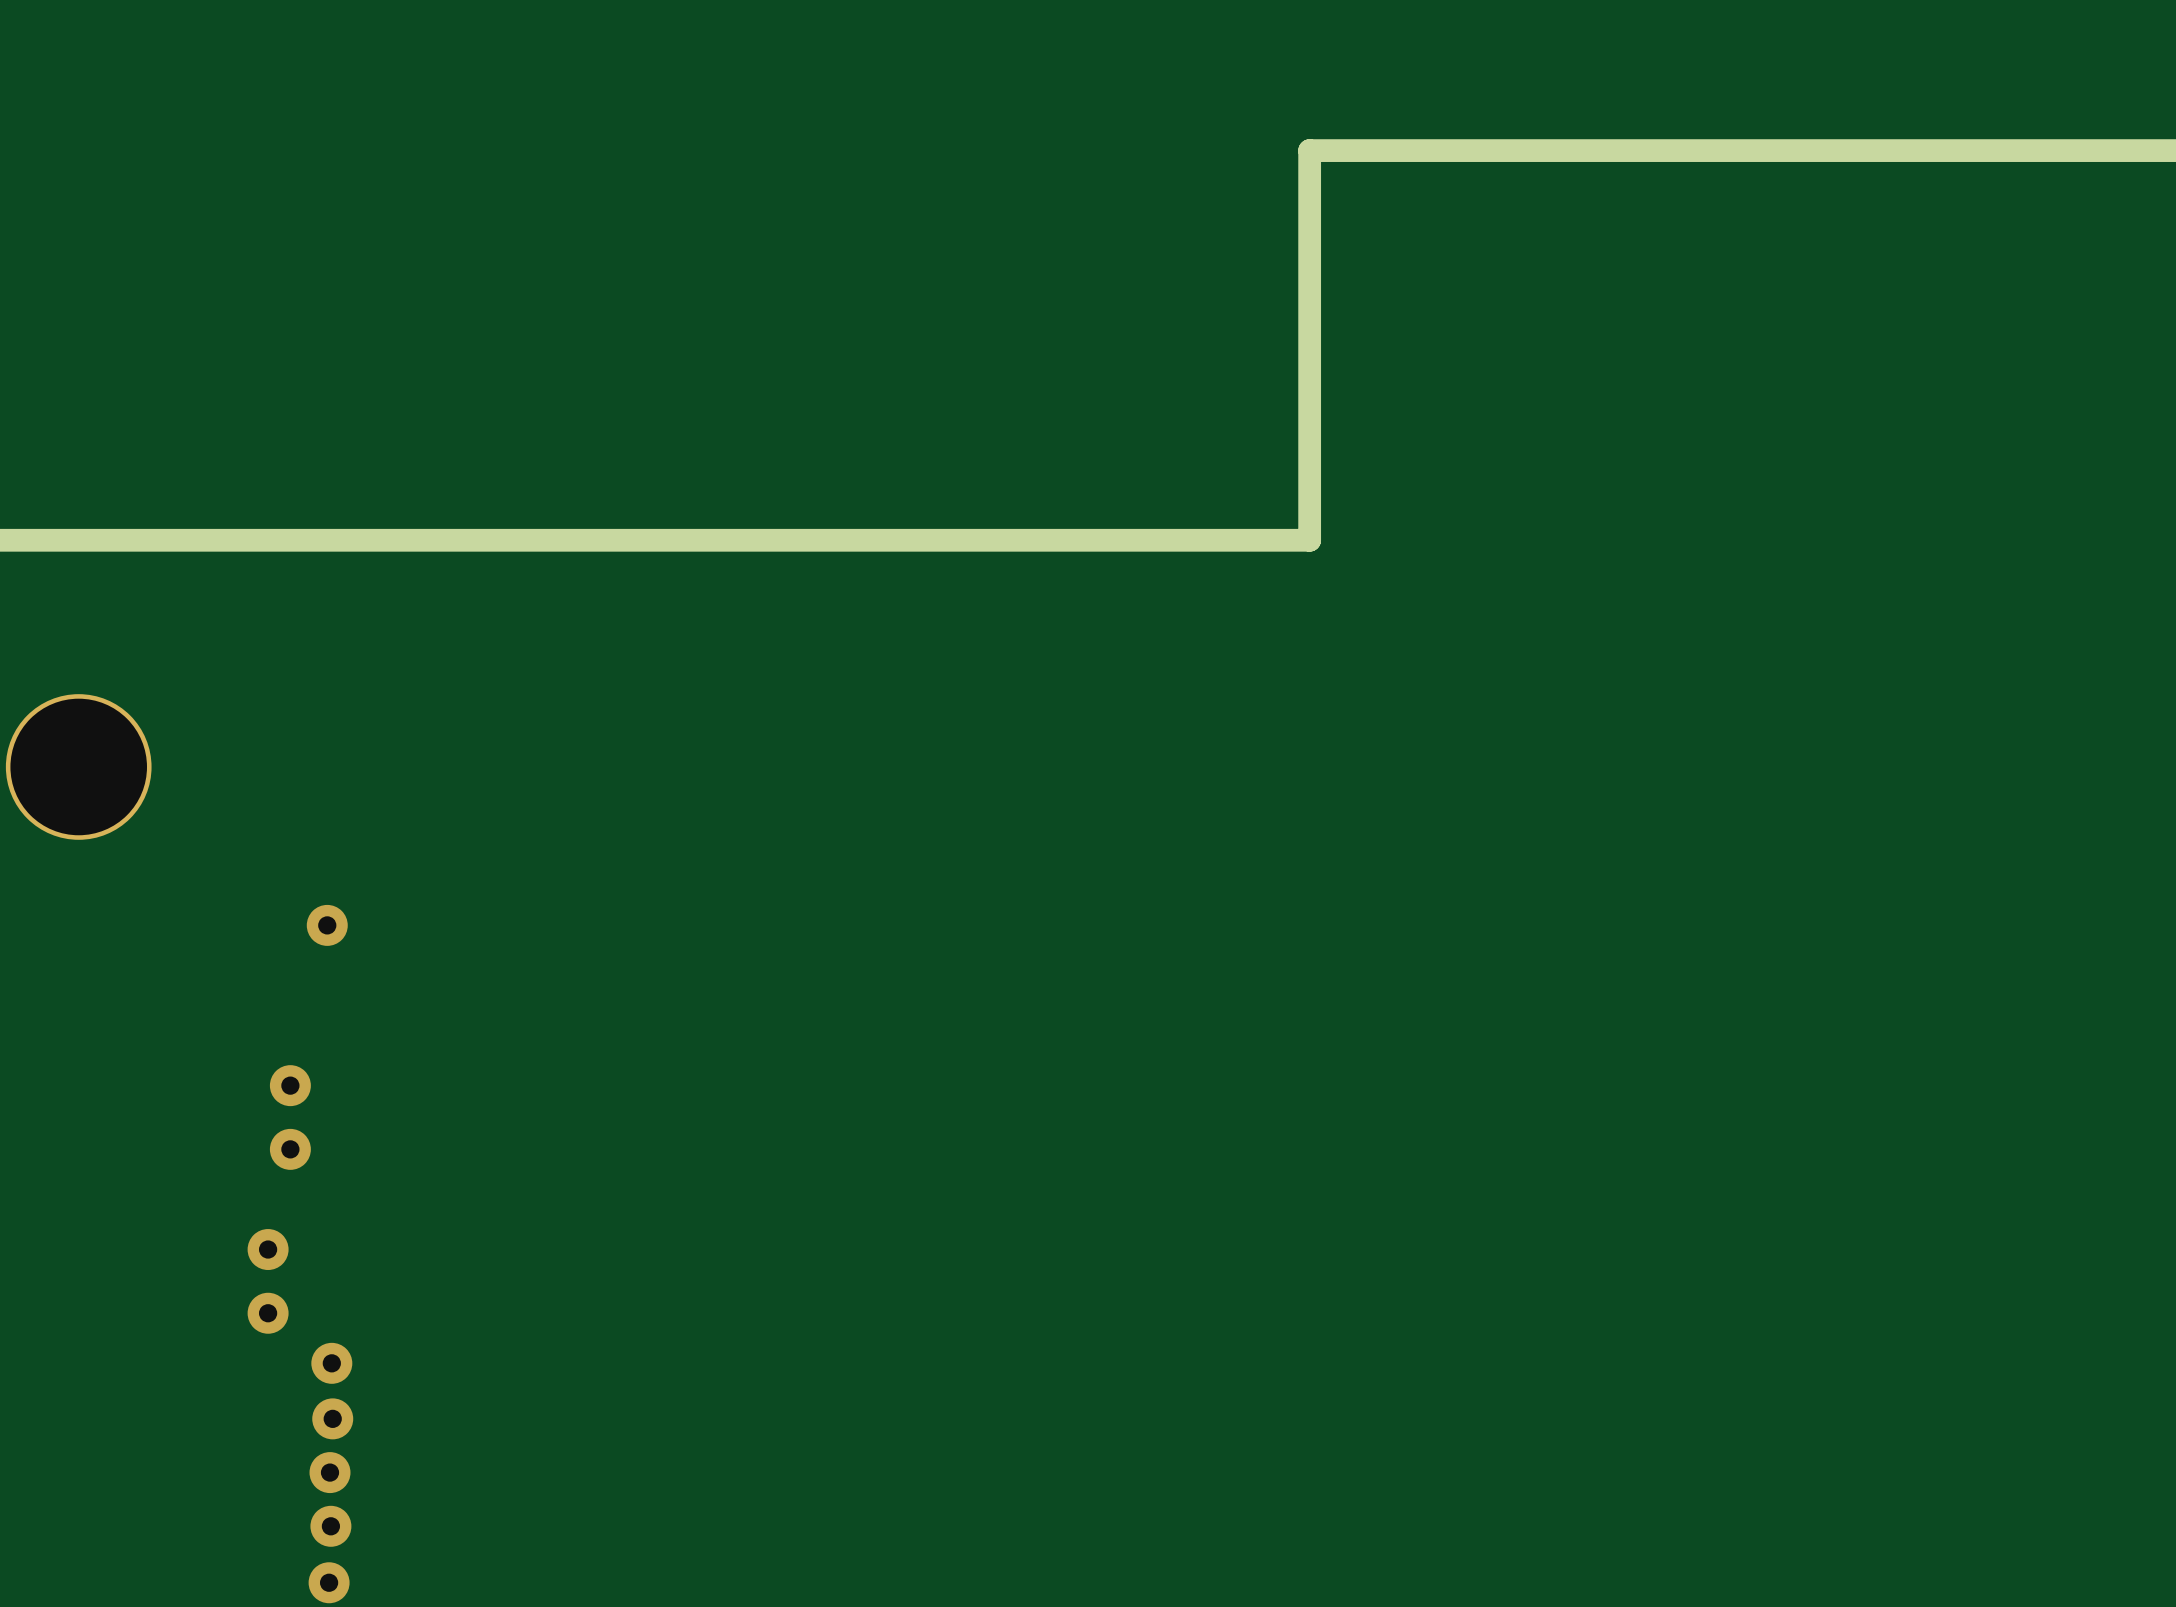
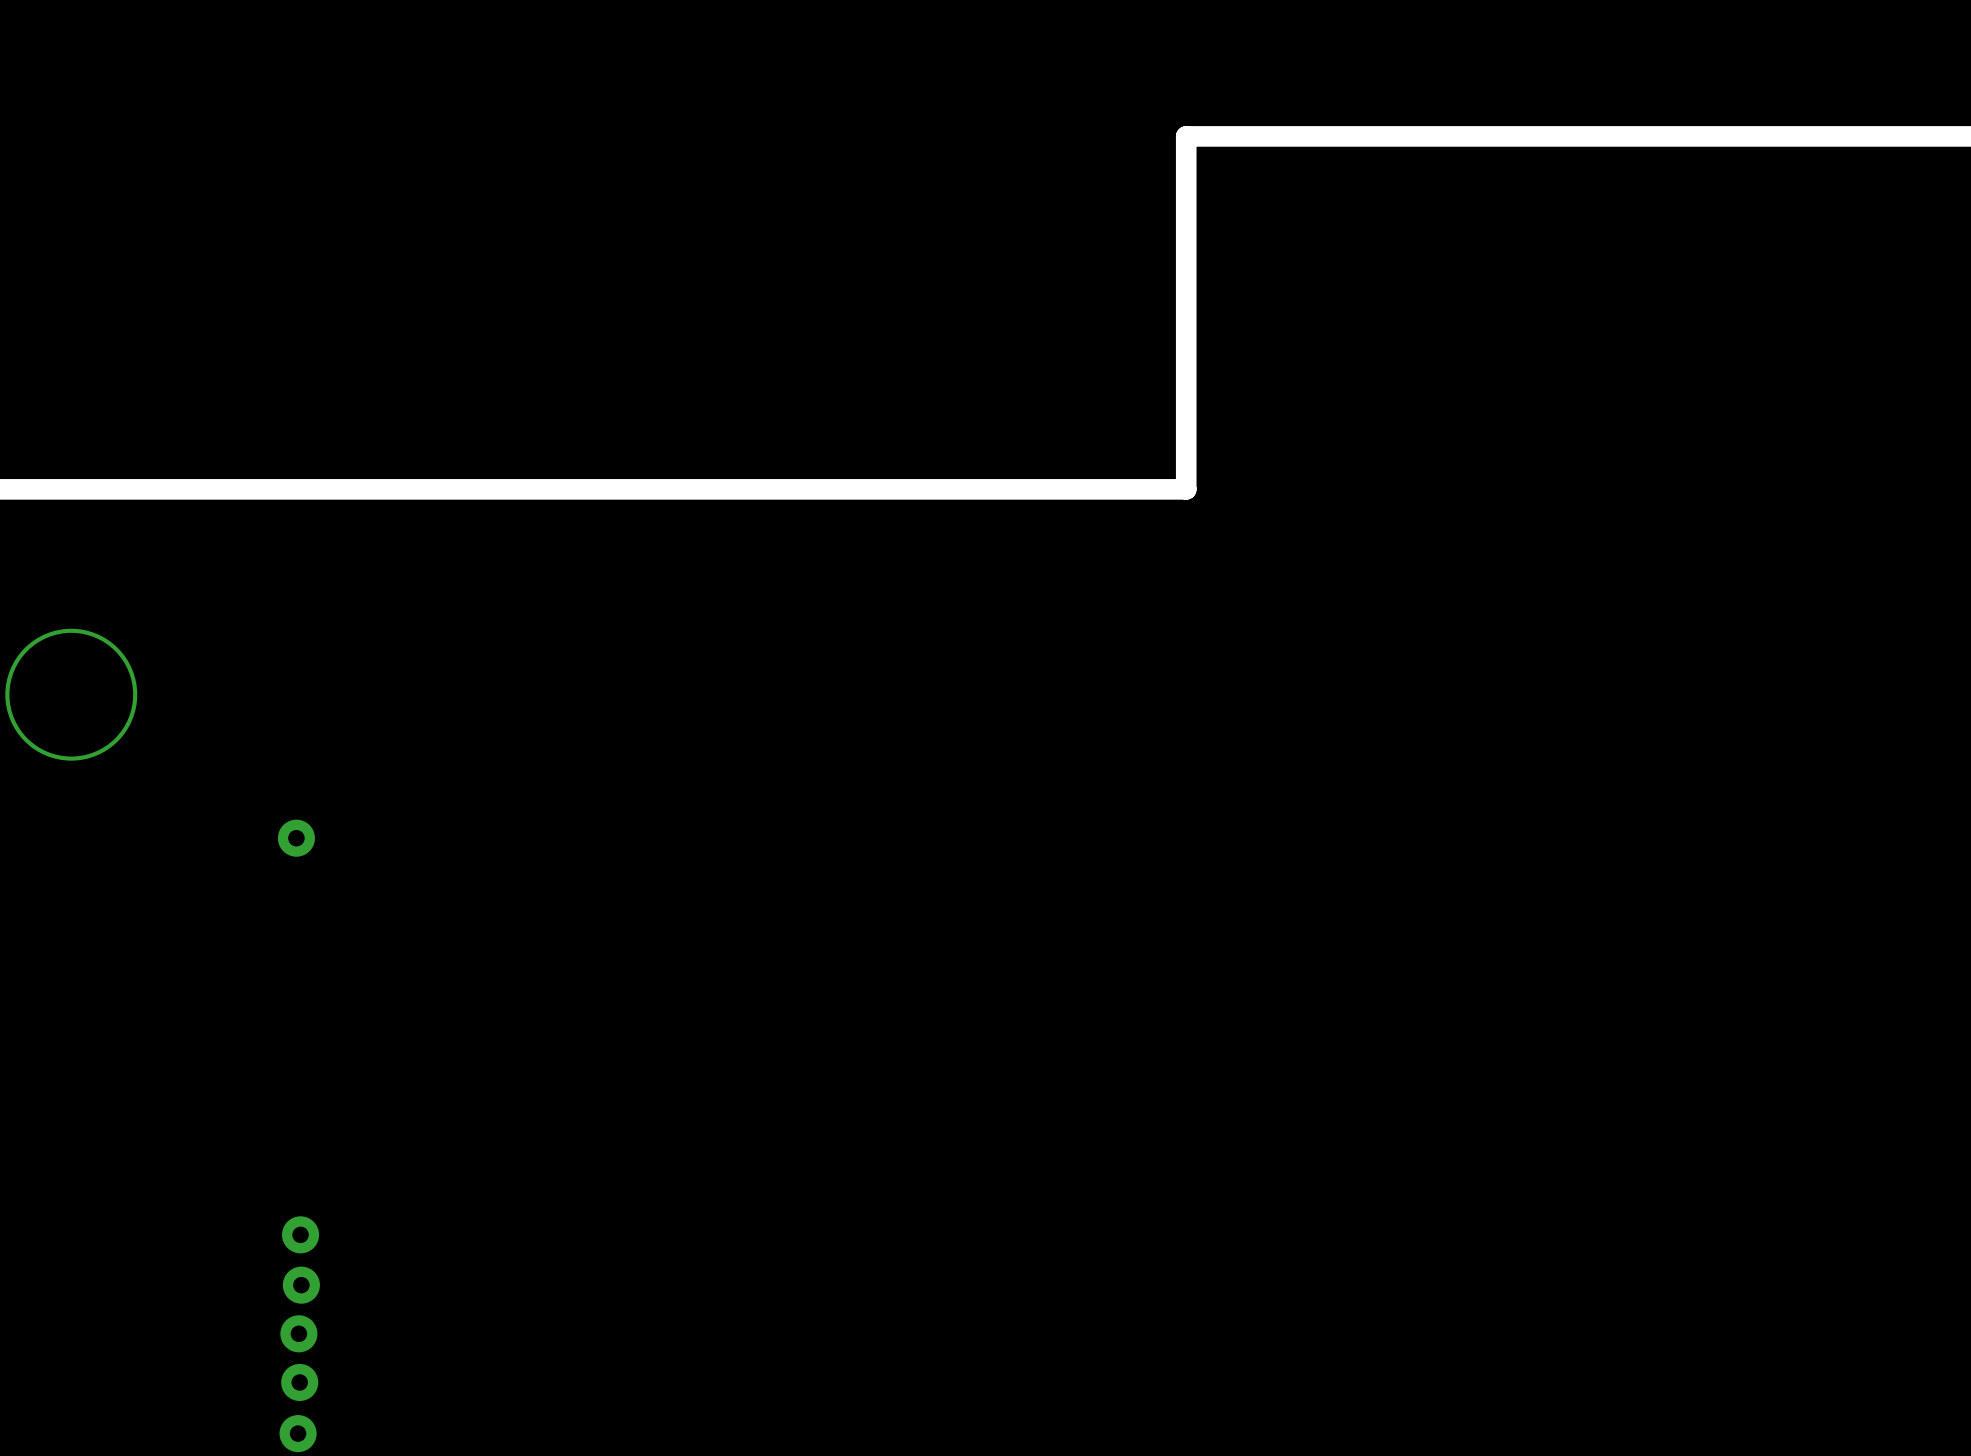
via: (290, 1085) -> none
via: (290, 1149) -> none
via: (268, 1249) -> none
via: (268, 1313) -> none

